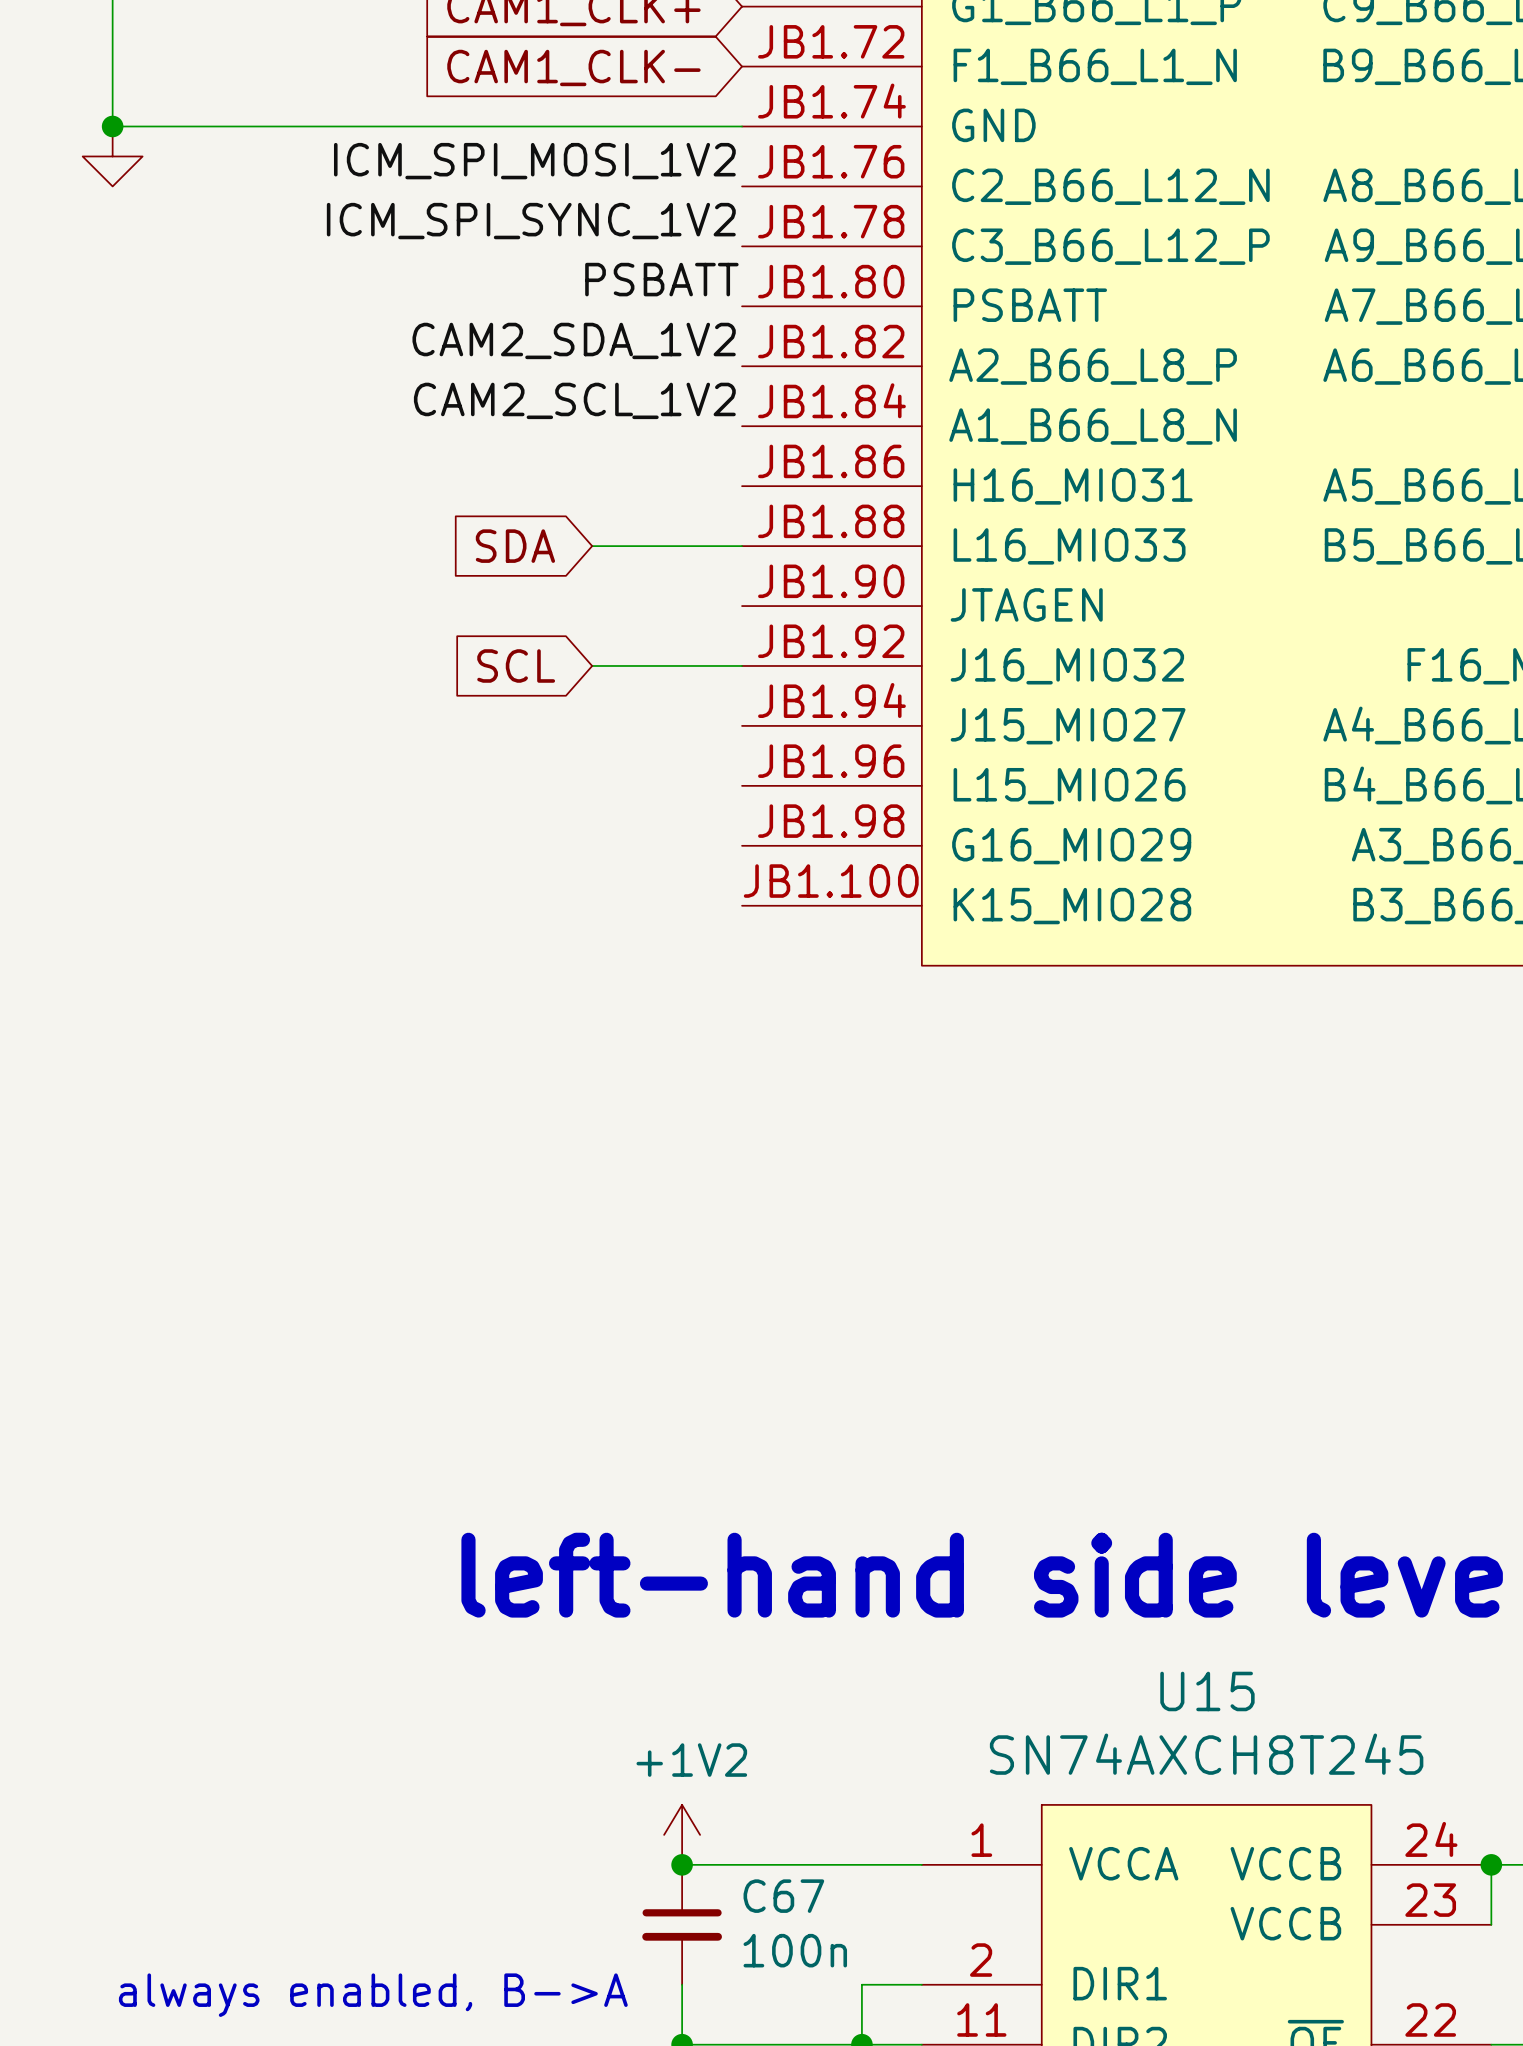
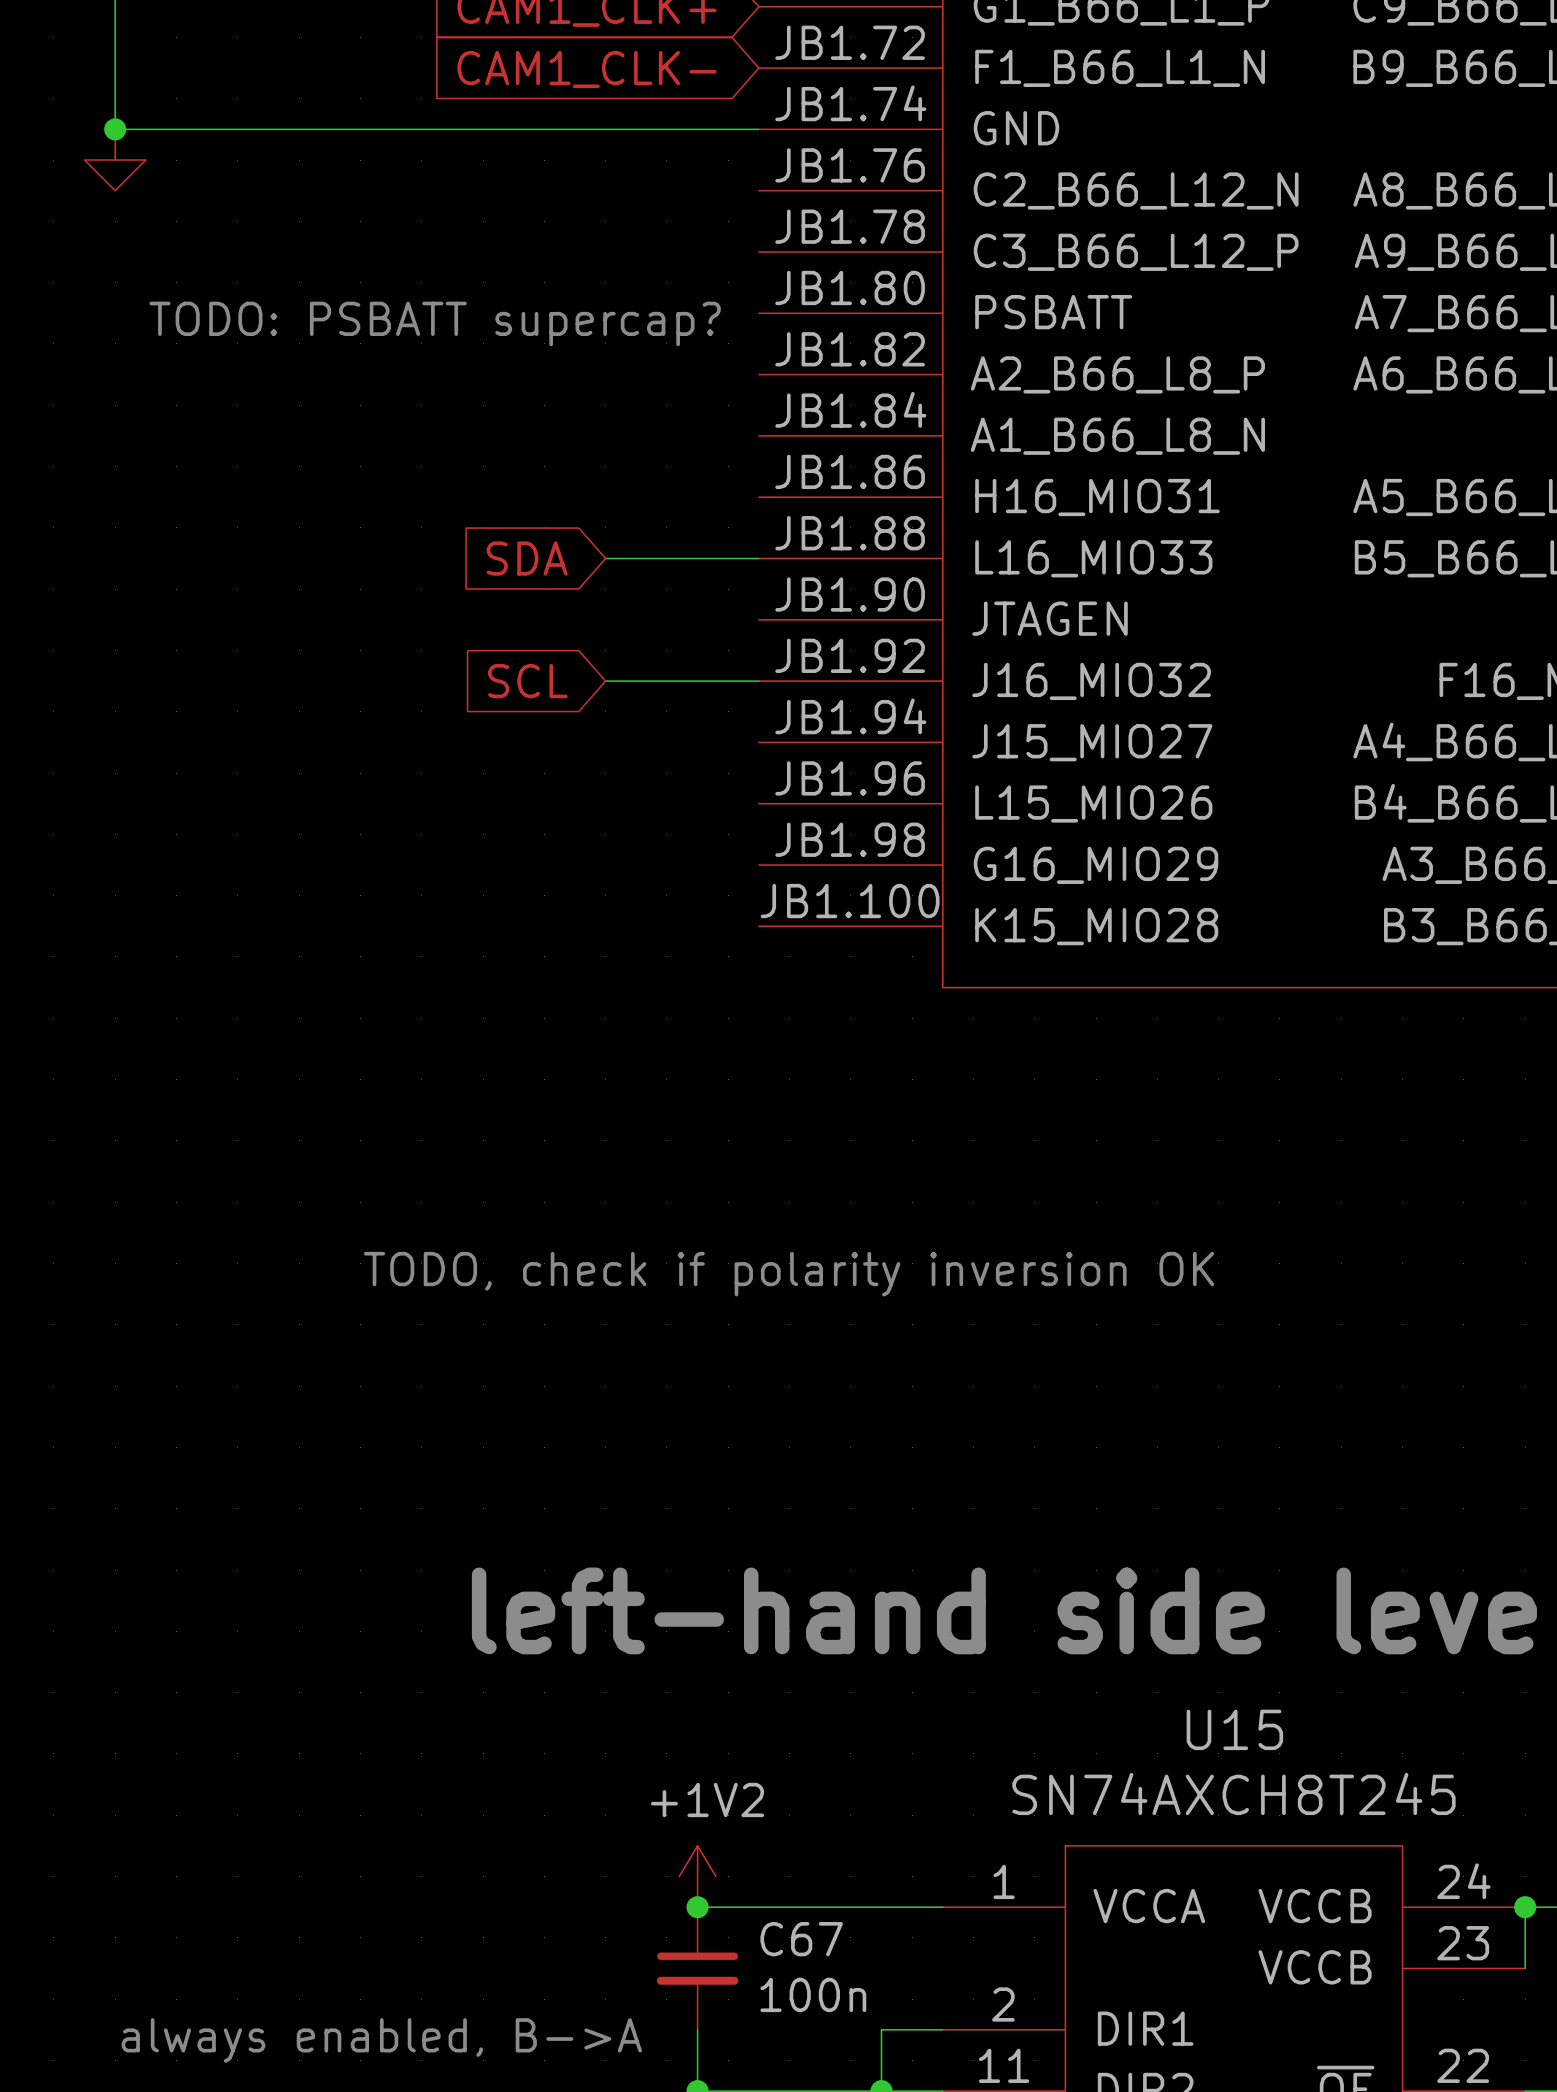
label: ICM_SPI_MOSI_1V2 (534, 161) -> none
label: ICM_SPI_SYNC_1V2 (531, 221) -> none
label: PSBATT (661, 279) -> none
text: none -> TODO: PSBATT supercap? (435, 323)
label: CAM2_SDA_1V2 (574, 340) -> none
label: CAM2_SCL_1V2 (574, 400) -> none
text: none -> TODO, check if polarity inversion OK (789, 1274)

